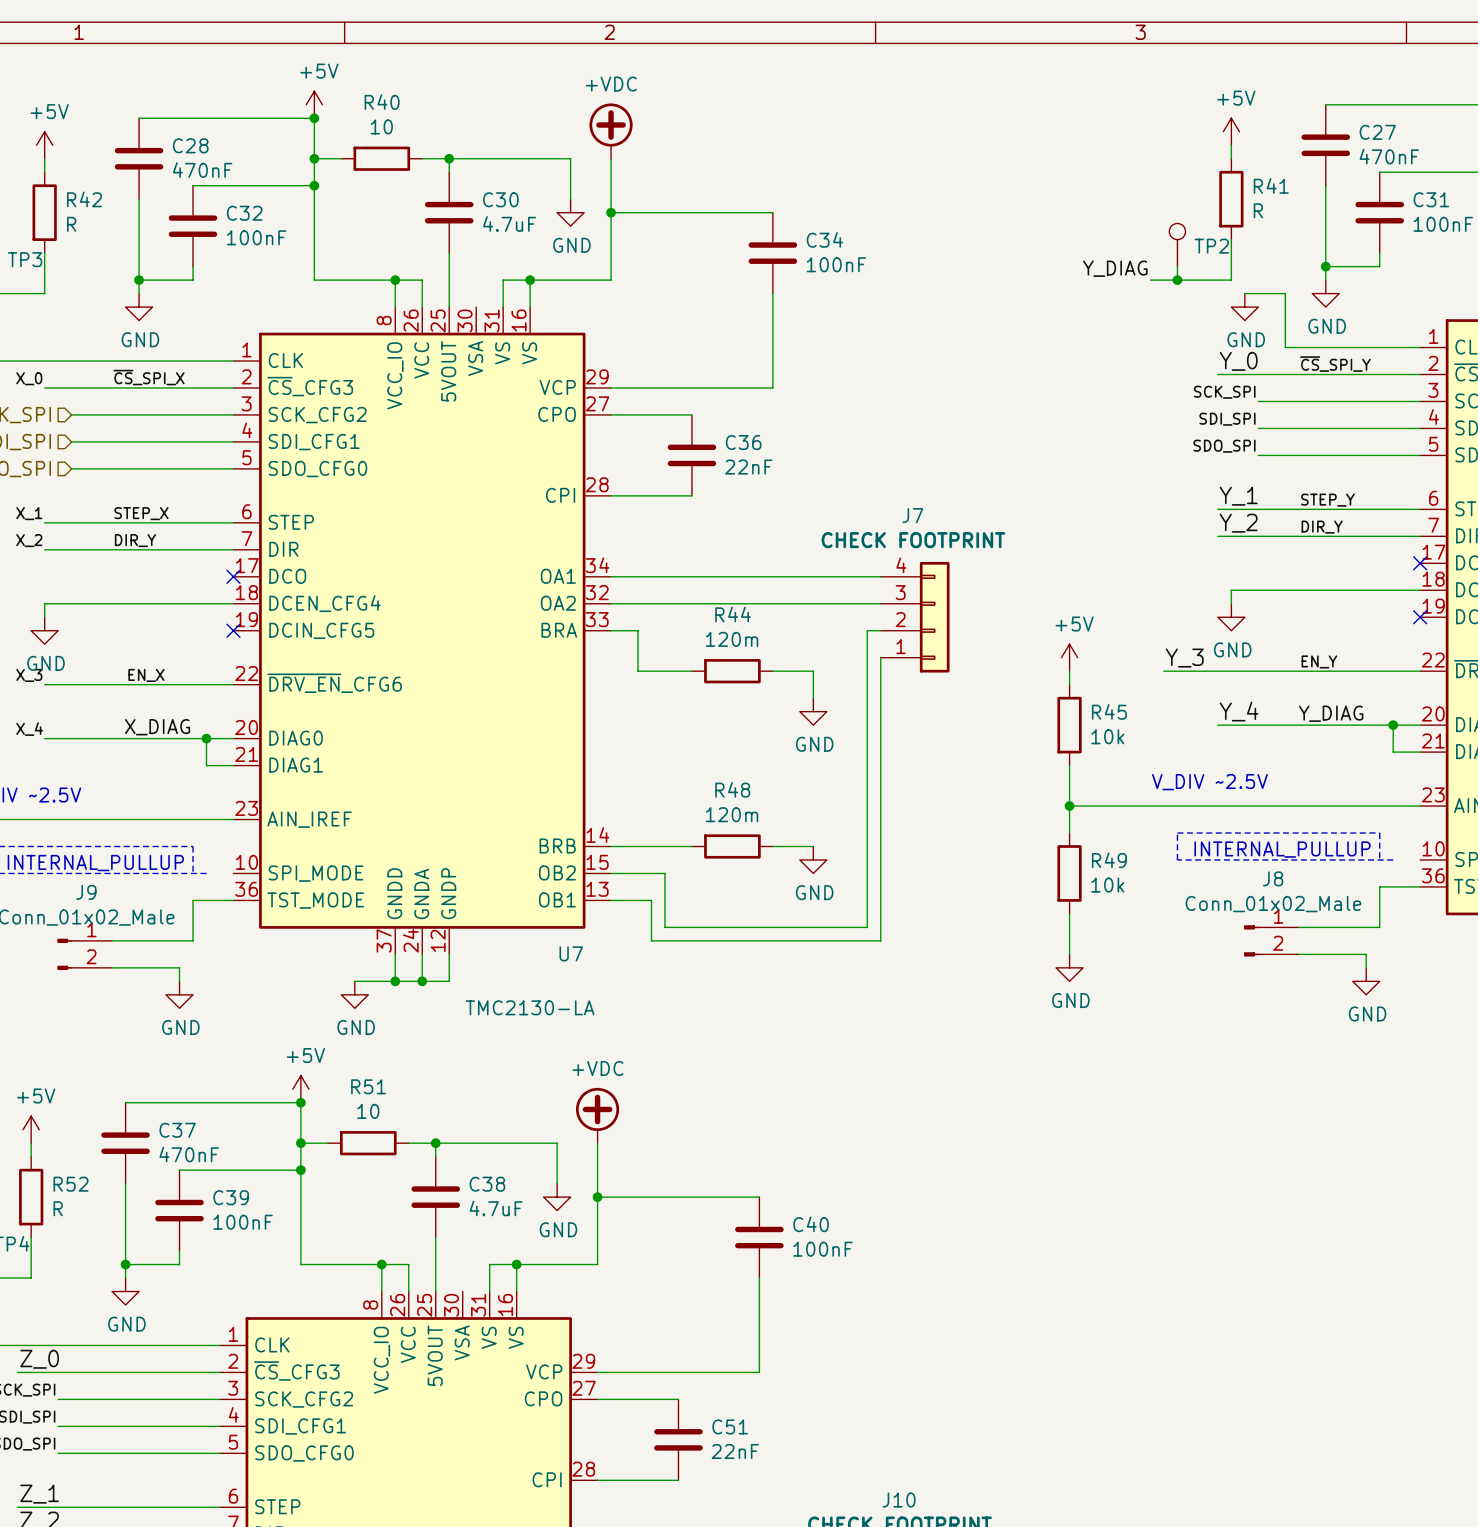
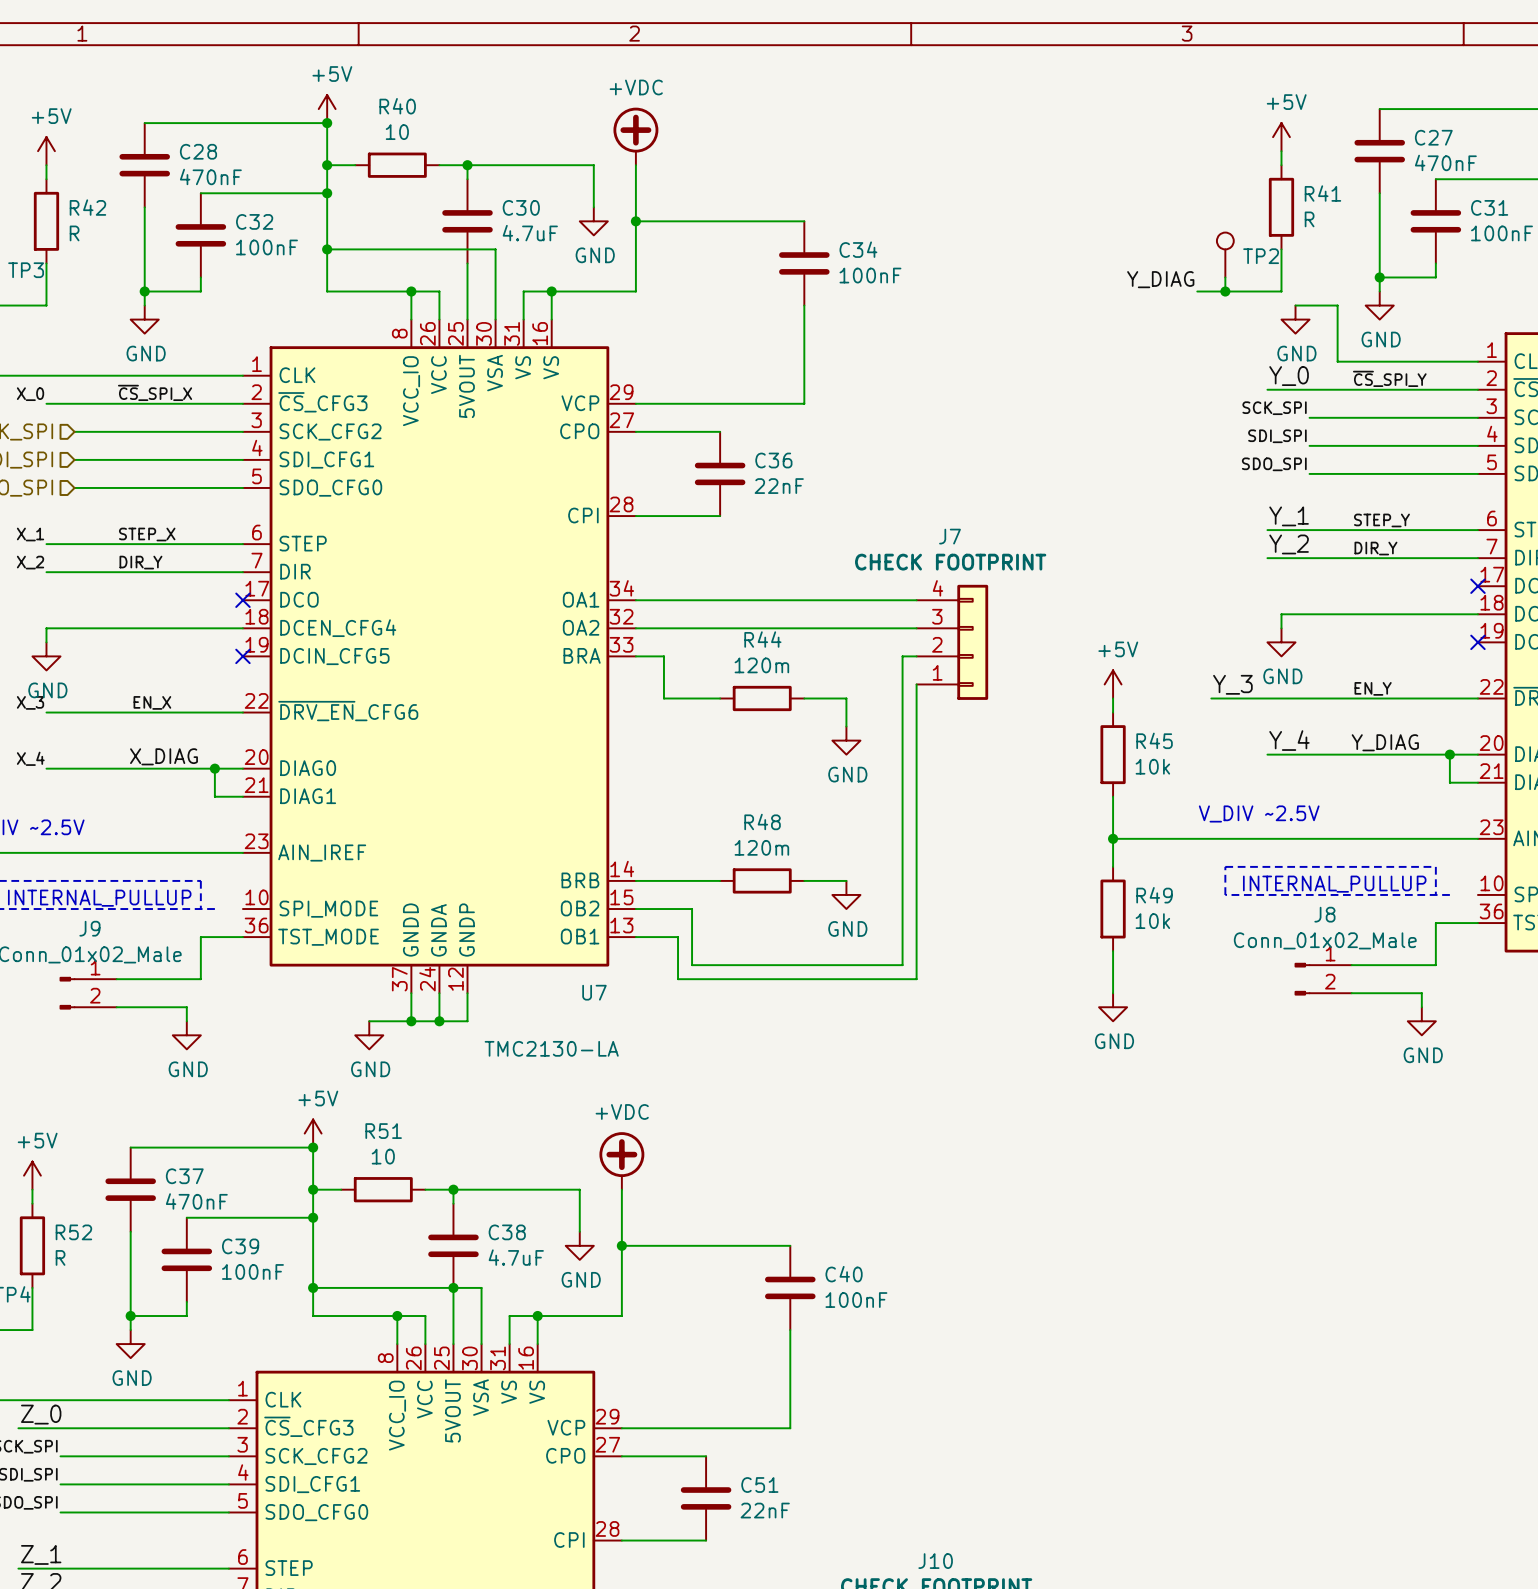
wire: none -> (327, 249) (495, 249) (495, 319)
junction: none -> (327, 249)
wire: none -> (313, 1287) (481, 1287) (481, 1344)
junction: none -> (313, 1287)
junction: none -> (453, 1287)

